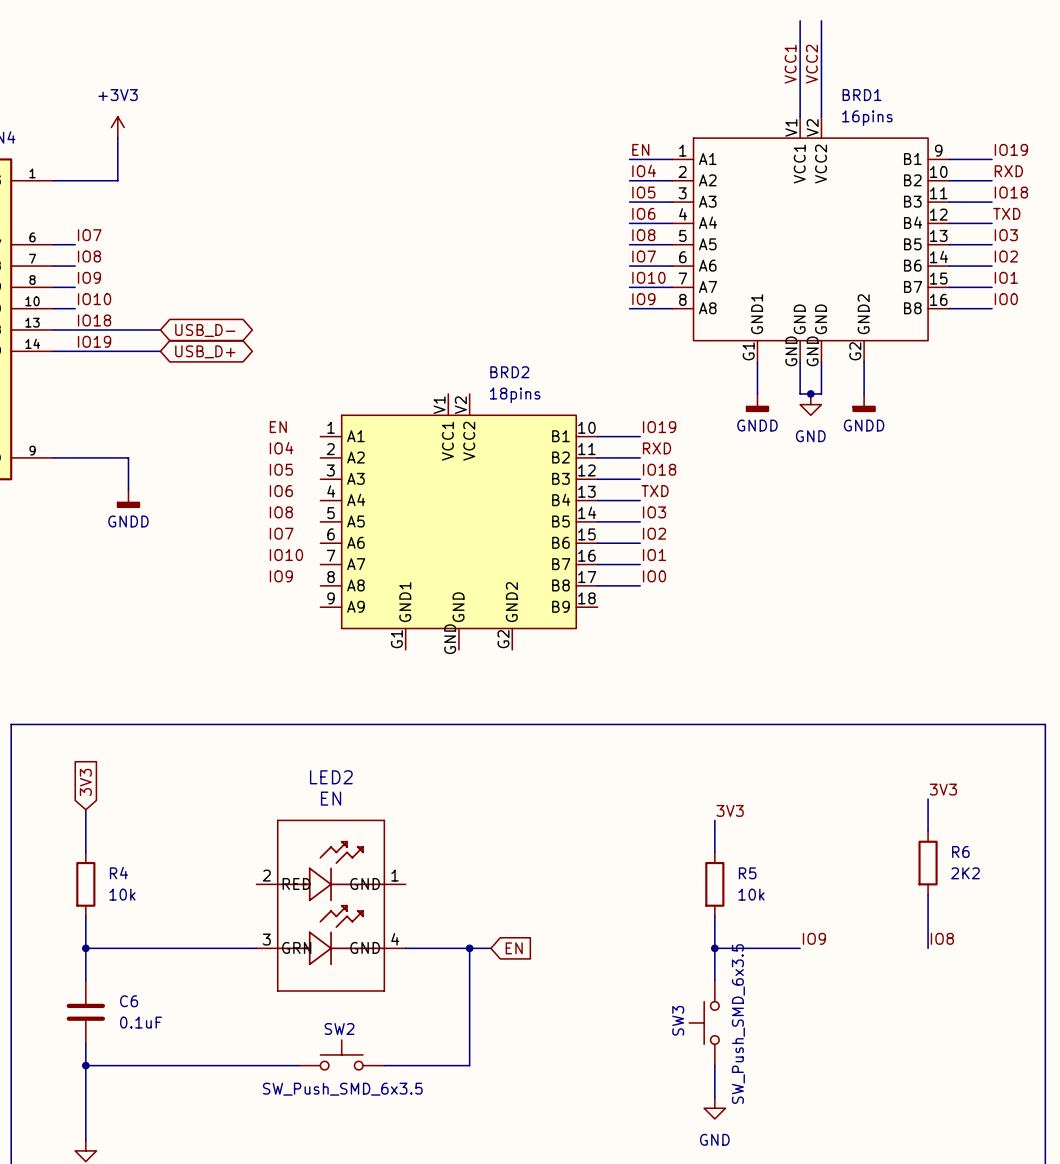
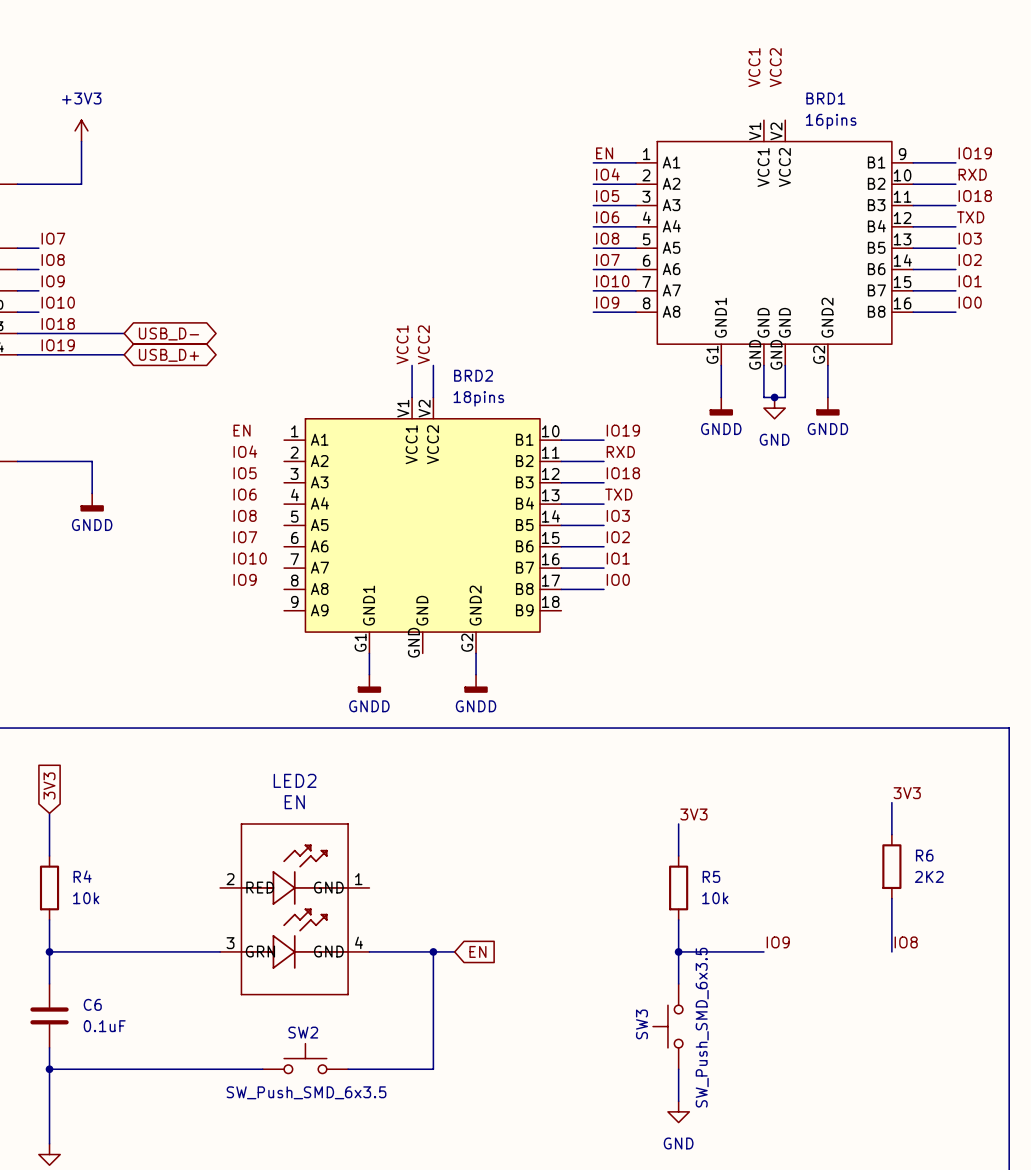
wire: (800, 20) (800, 116) -> none
wire: (821, 20) (821, 116) -> none
label: none -> VCC1 (402, 344)
label: none -> VCC2 (423, 344)
wire: none -> (412, 365) (412, 397)
wire: none -> (433, 365) (433, 397)
wire: none -> (369, 653) (369, 674)
wire: none -> (476, 653) (476, 674)
power symbol: none -> GNDD (369, 683)
power symbol: none -> GNDD (476, 683)

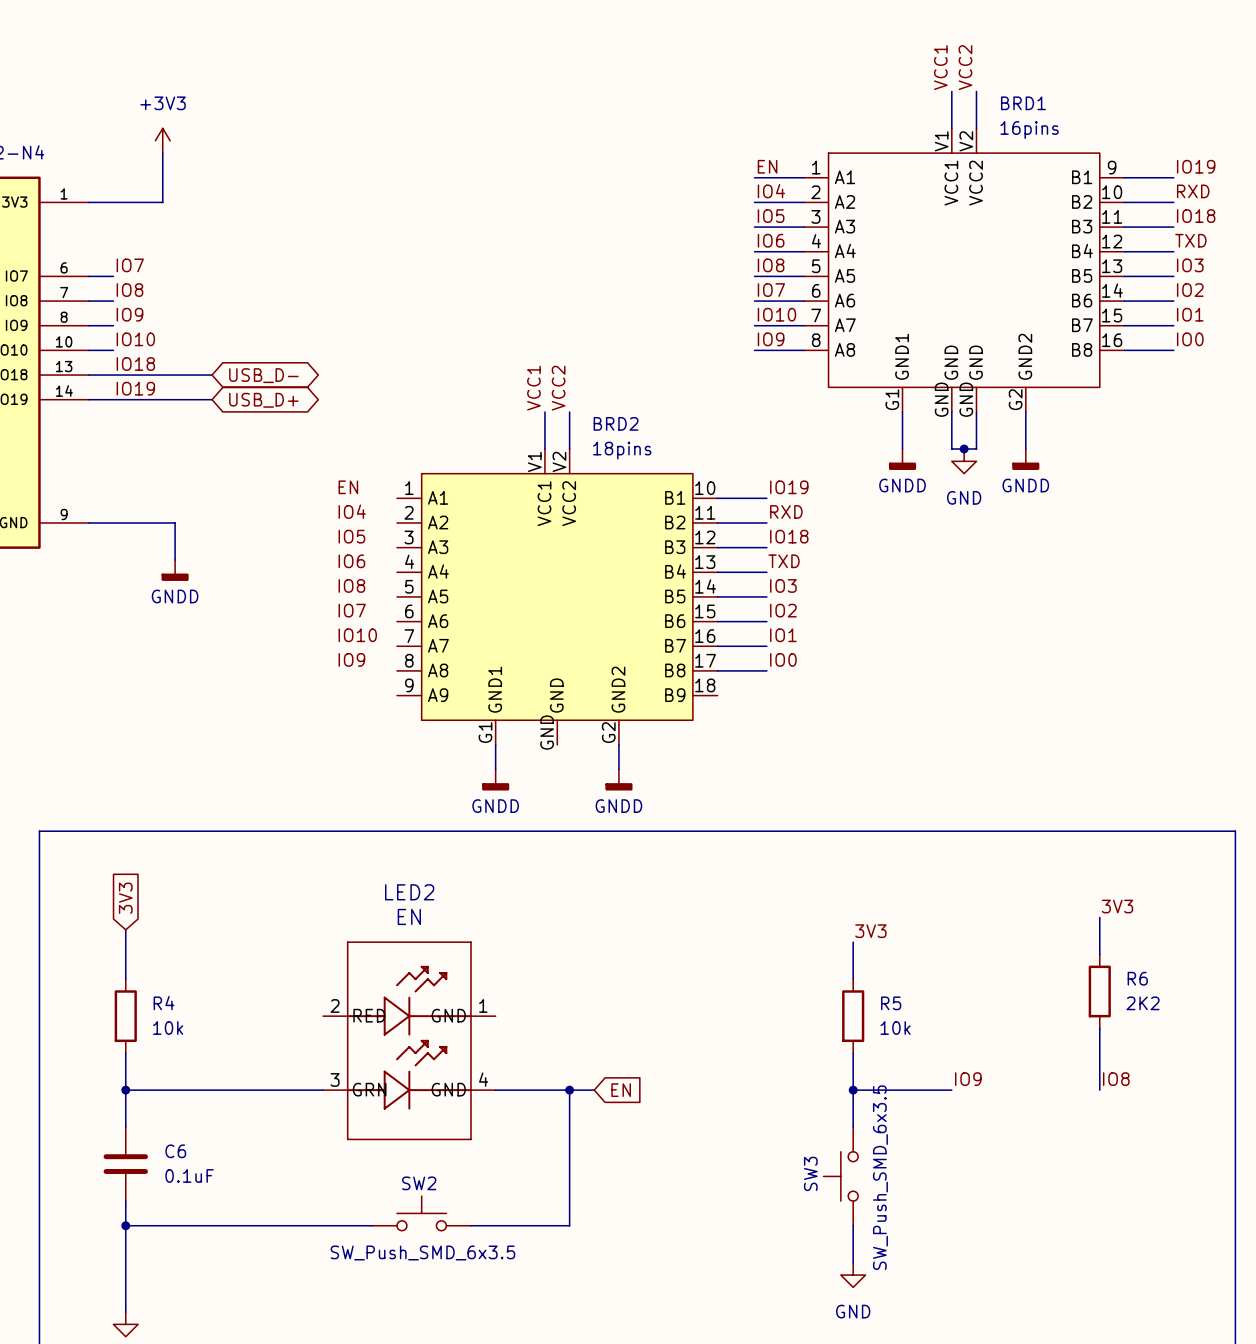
wire: none -> (951, 91) (951, 128)
wire: none -> (976, 91) (976, 128)

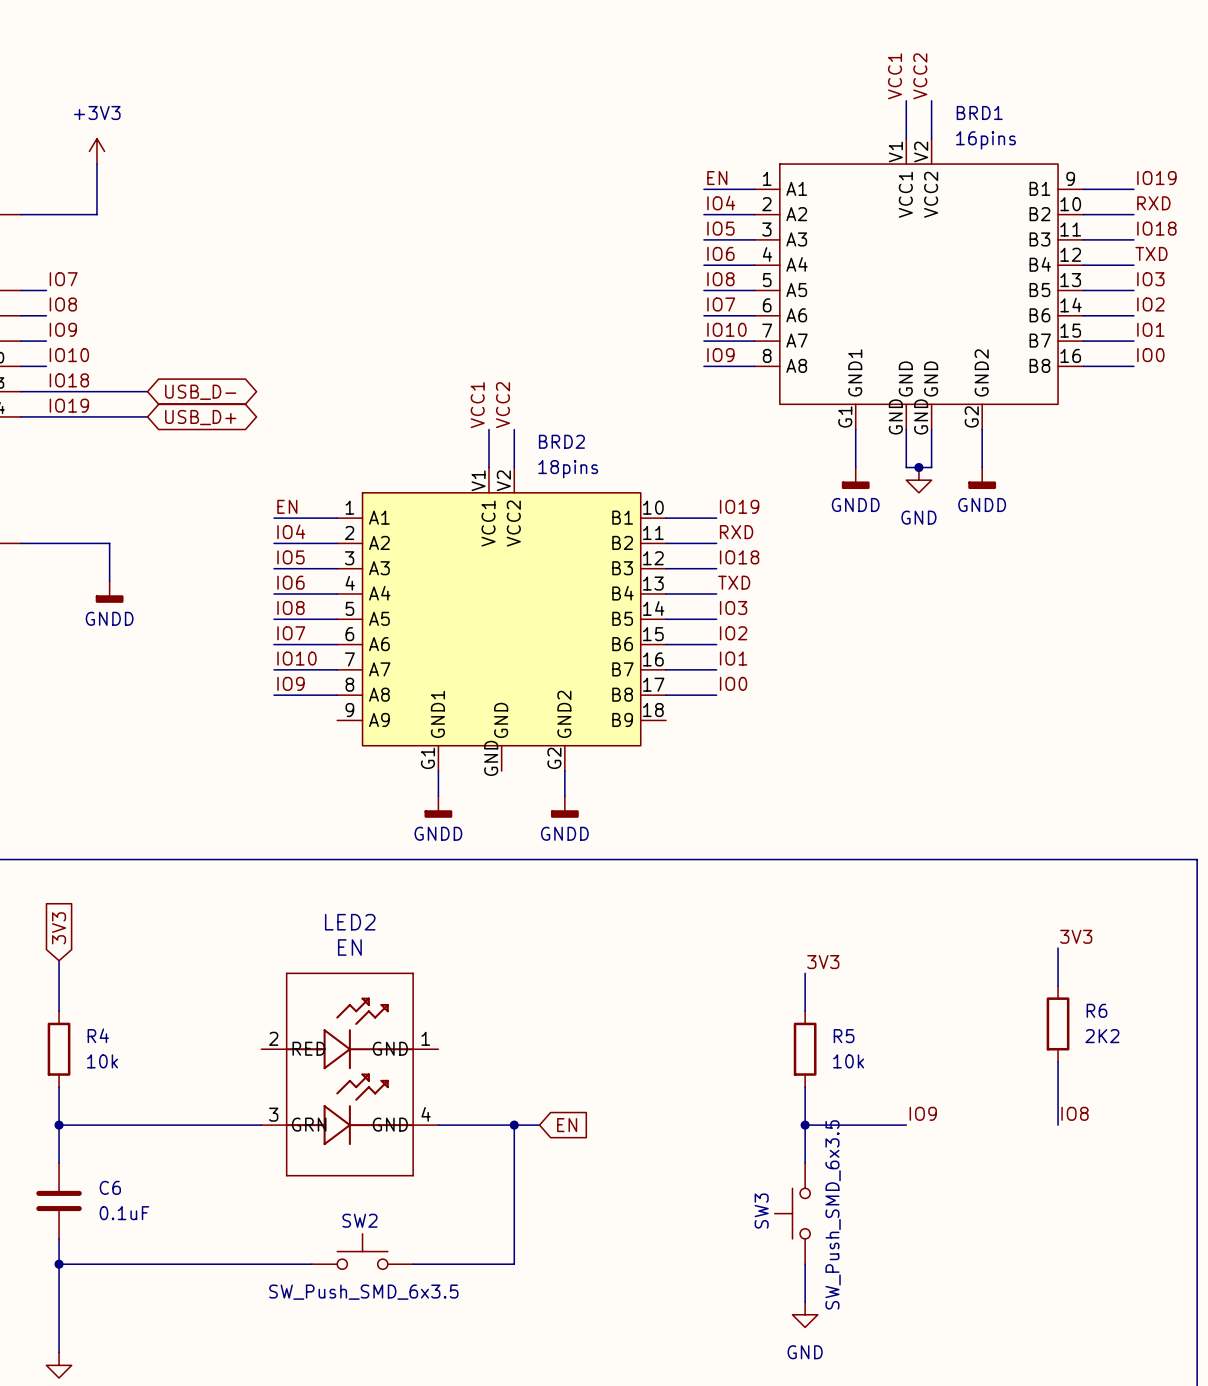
wire: none -> (274, 518) (337, 518)
wire: none -> (274, 543) (337, 543)
wire: none -> (274, 568) (337, 568)
wire: none -> (274, 593) (337, 593)
wire: none -> (274, 619) (337, 619)
wire: none -> (274, 644) (337, 644)
wire: none -> (274, 669) (337, 669)
wire: none -> (274, 695) (337, 695)

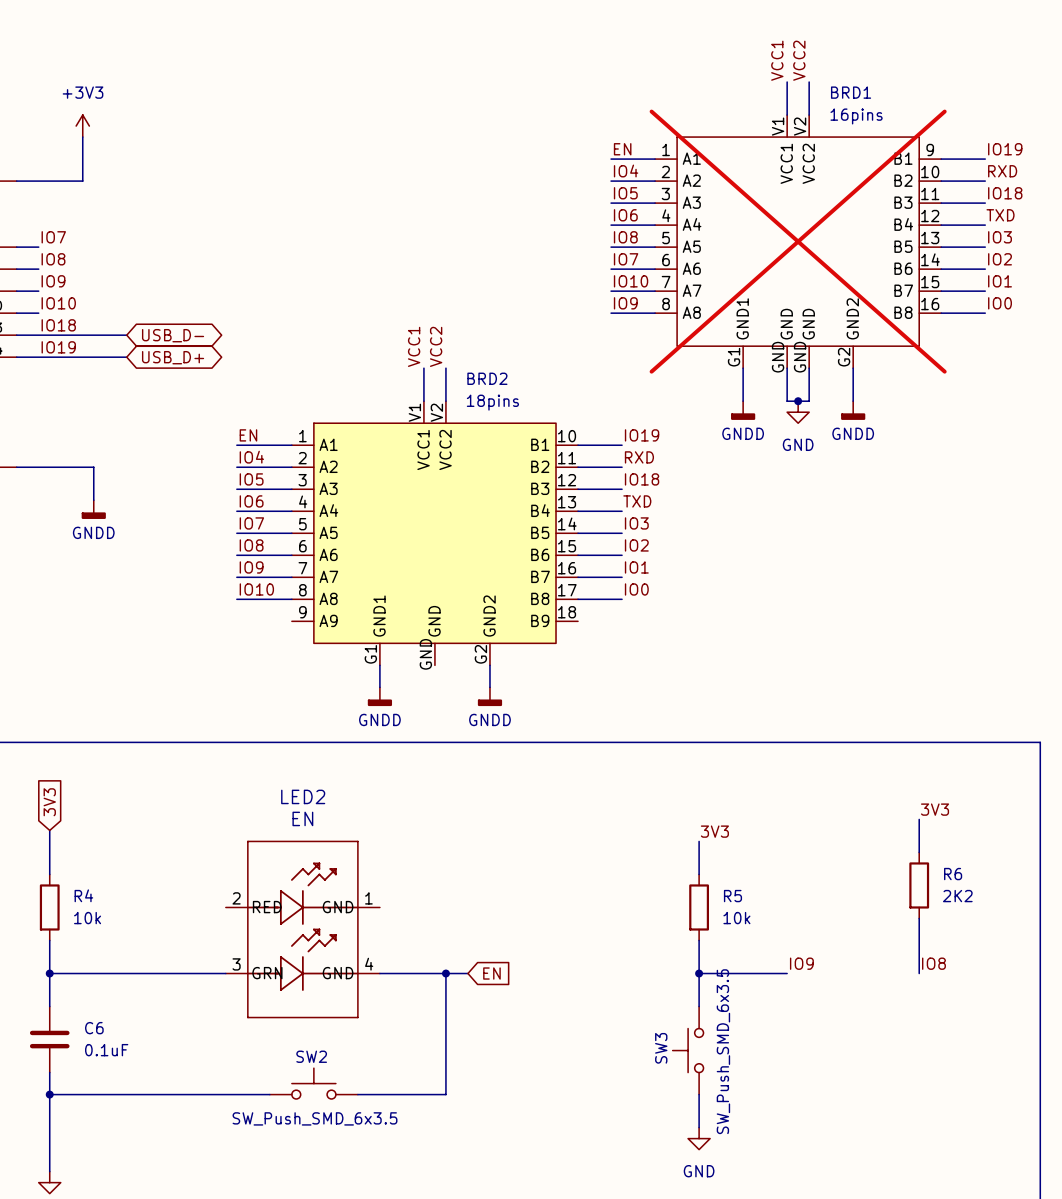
BRD1 do-not-place cross: none -> (798, 241)
label: IO8 (290, 607) -> IO7 (251, 523)
label: IO7 (291, 633) -> IO8 (251, 545)
label: IO10 (296, 658) -> IO9 (251, 567)
label: IO9 (290, 683) -> IO10 (256, 589)

